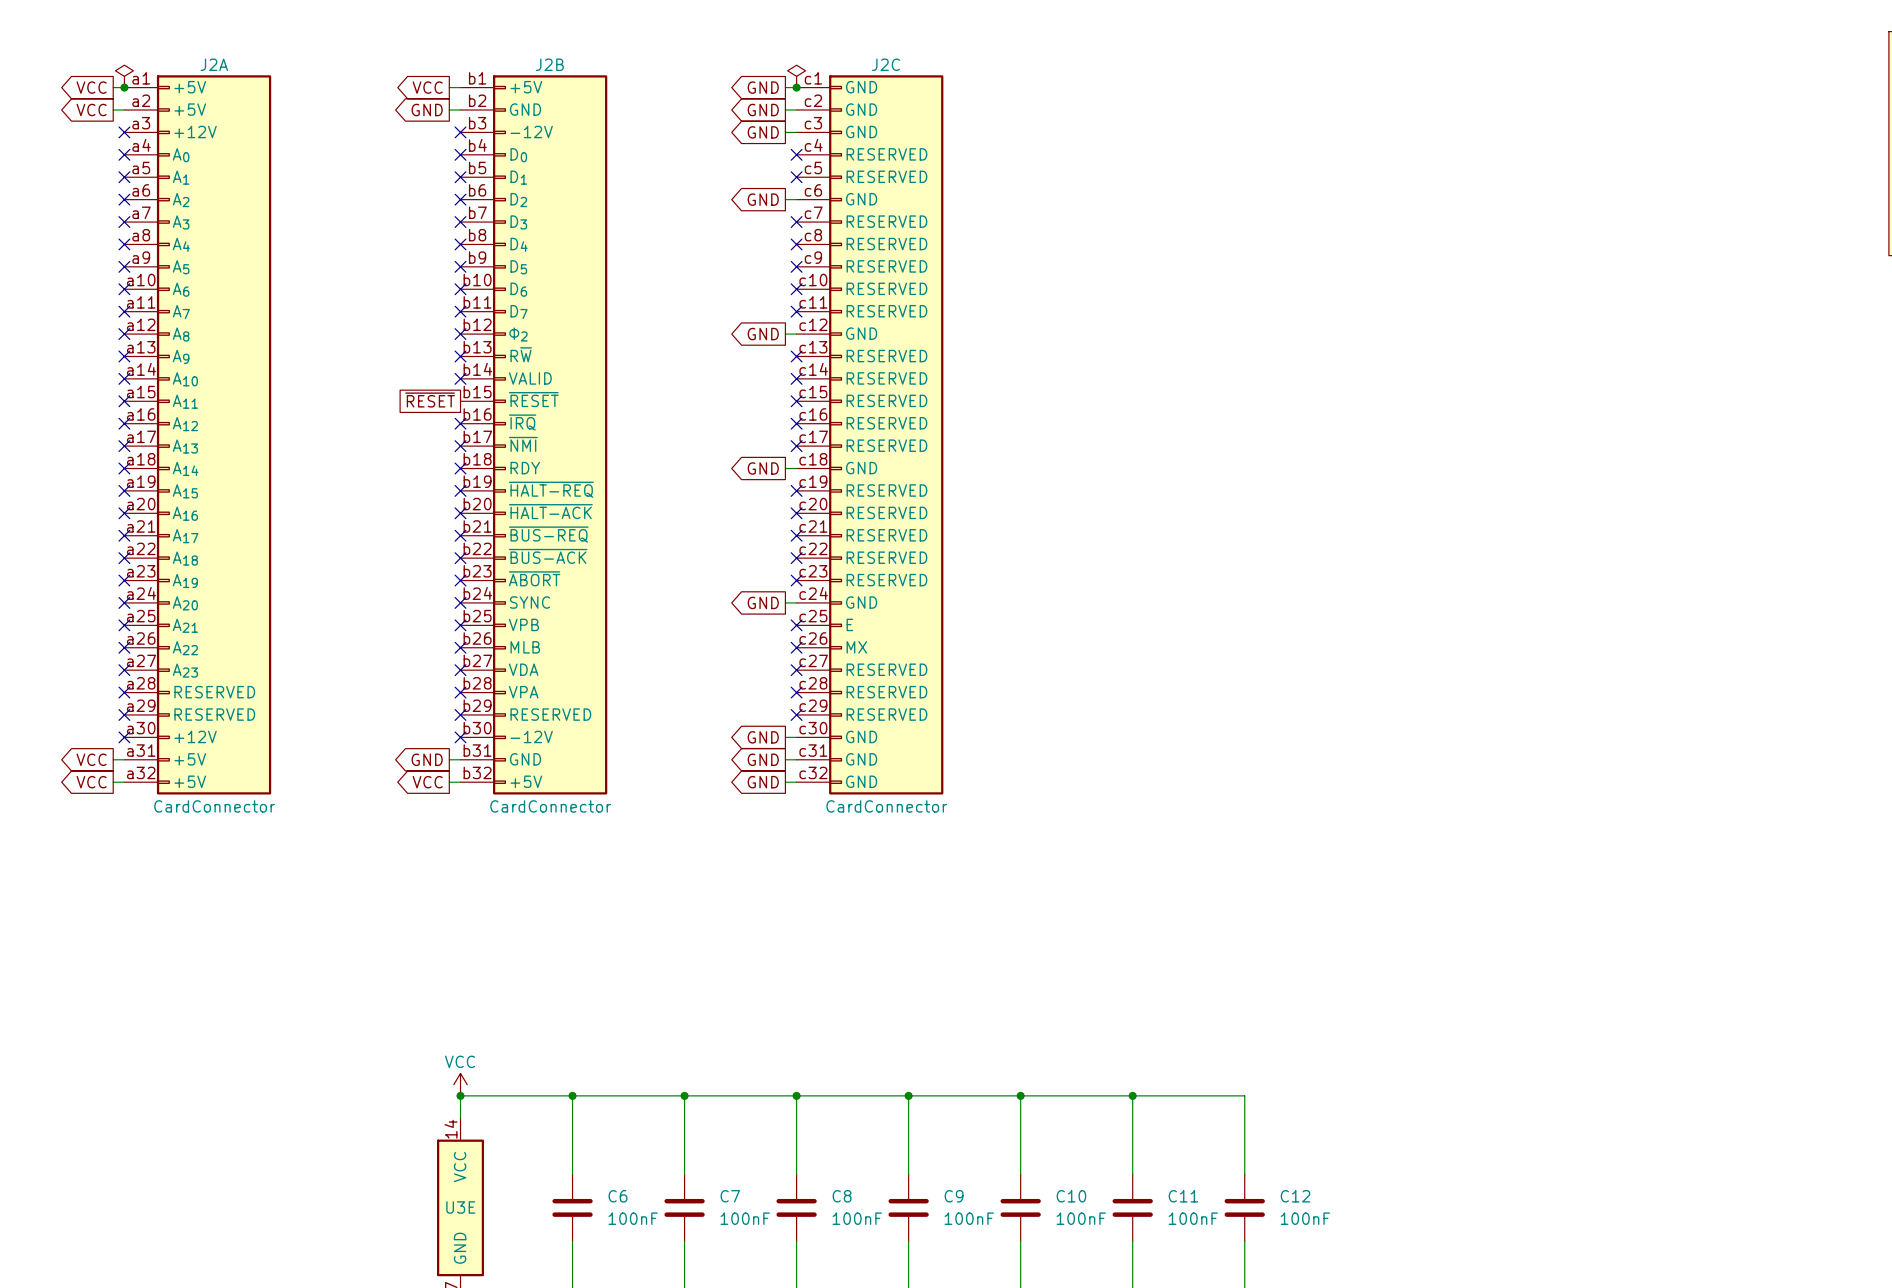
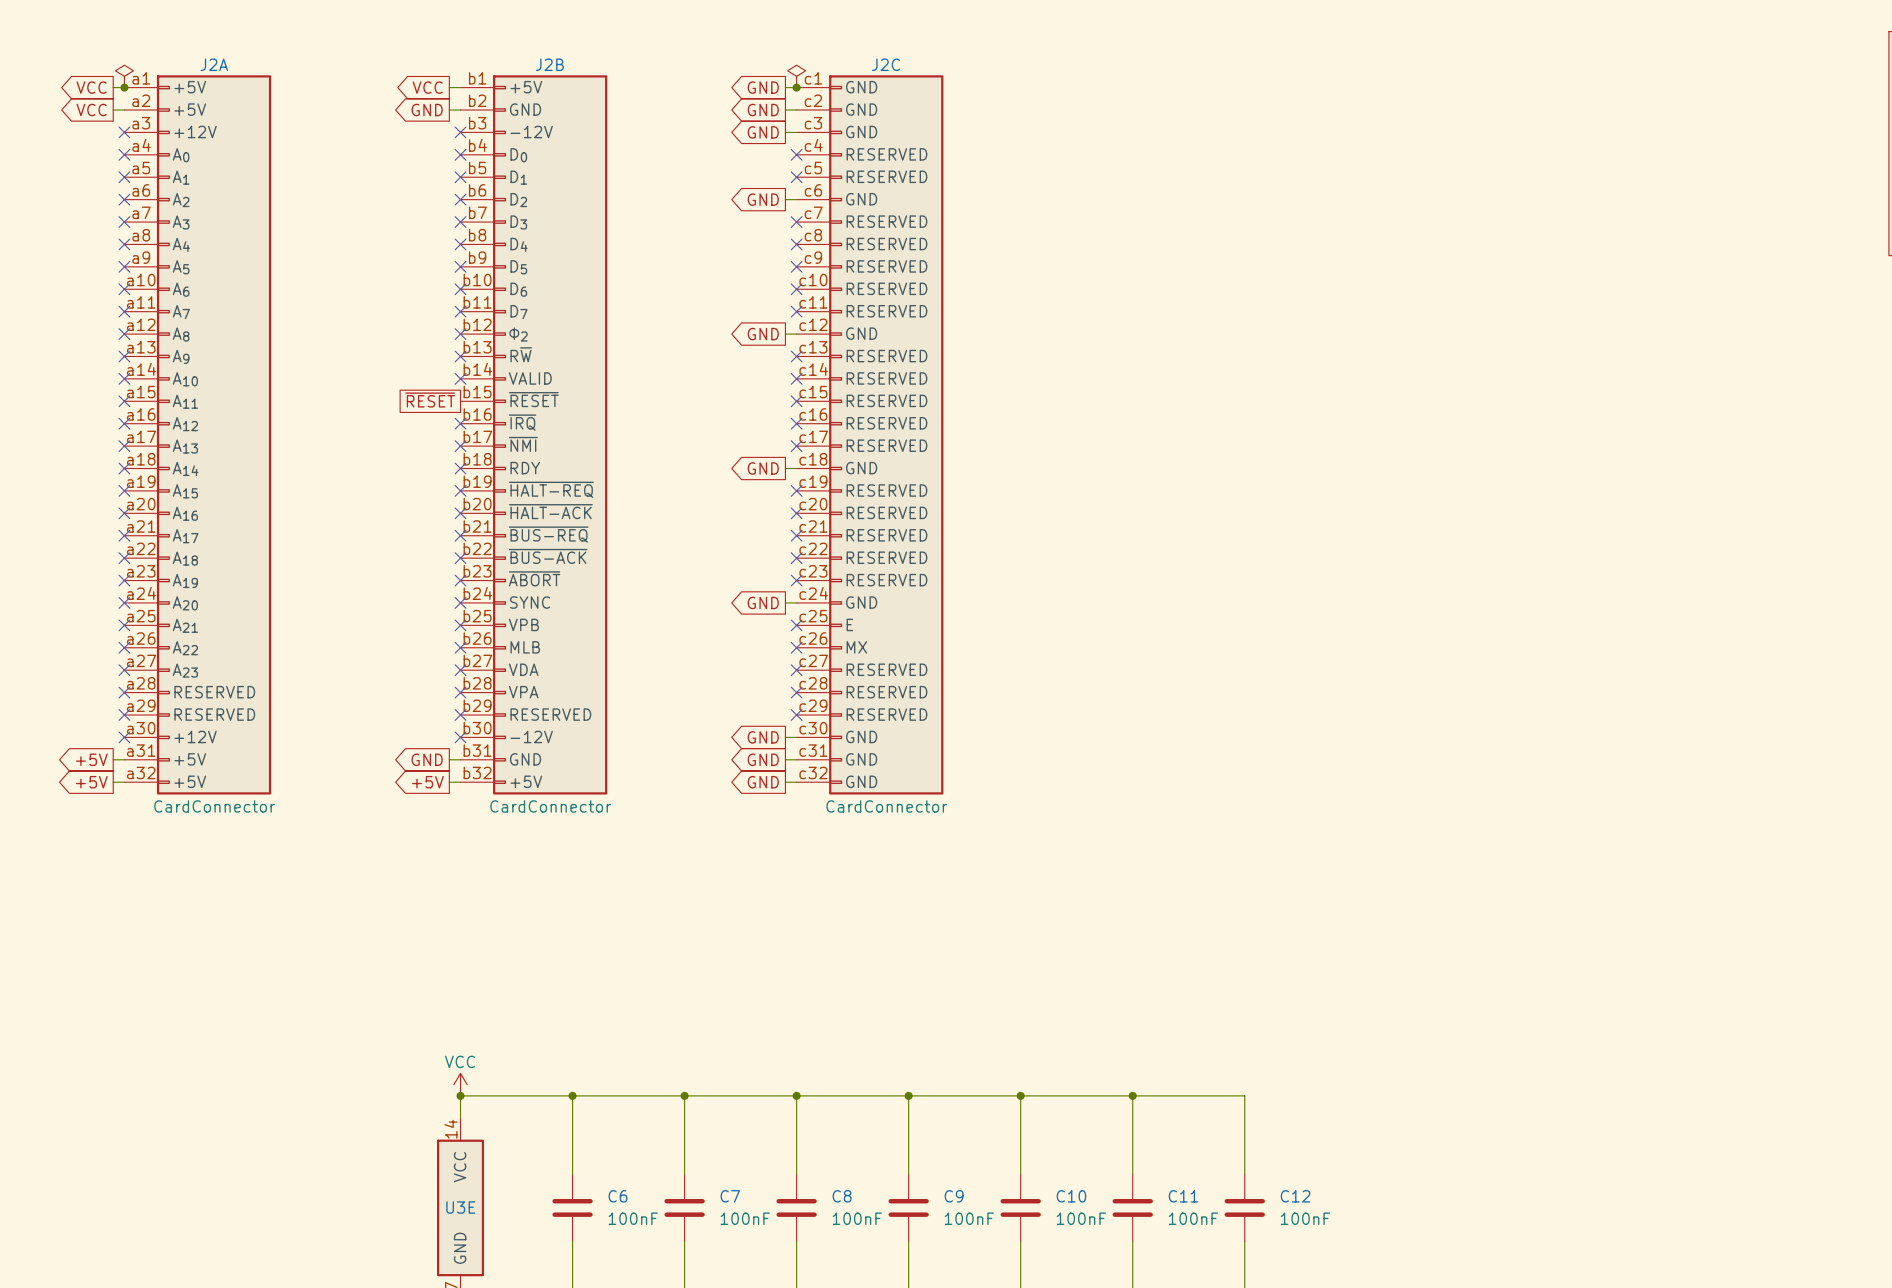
global label: VCC (91, 759) -> +5V (91, 759)
global label: VCC (91, 782) -> +5V (91, 782)
global label: VCC (427, 782) -> +5V (427, 782)

